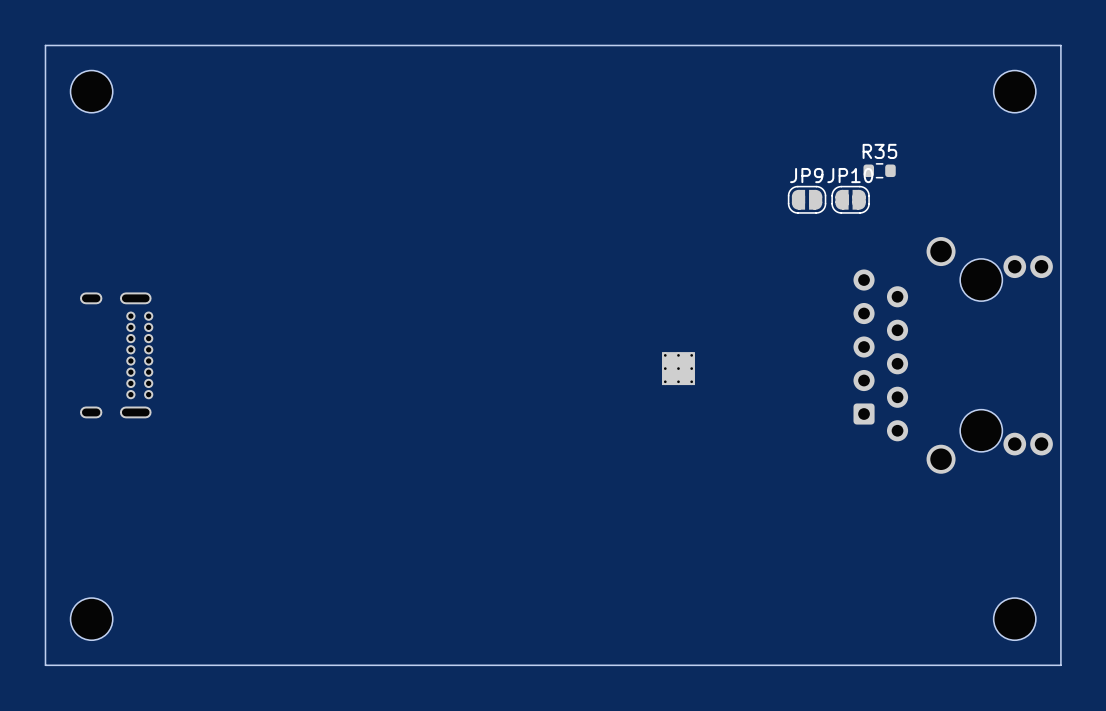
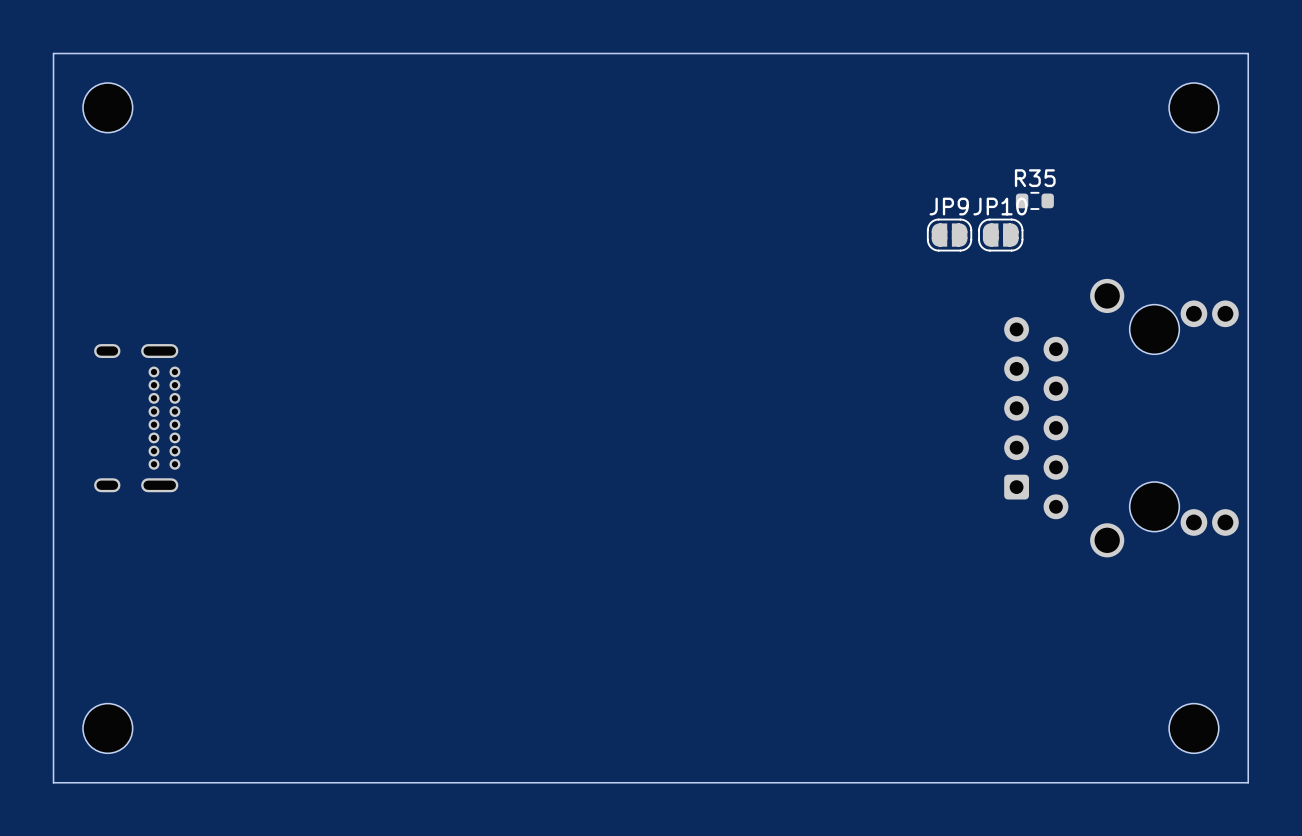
part: (678, 368) -> none

